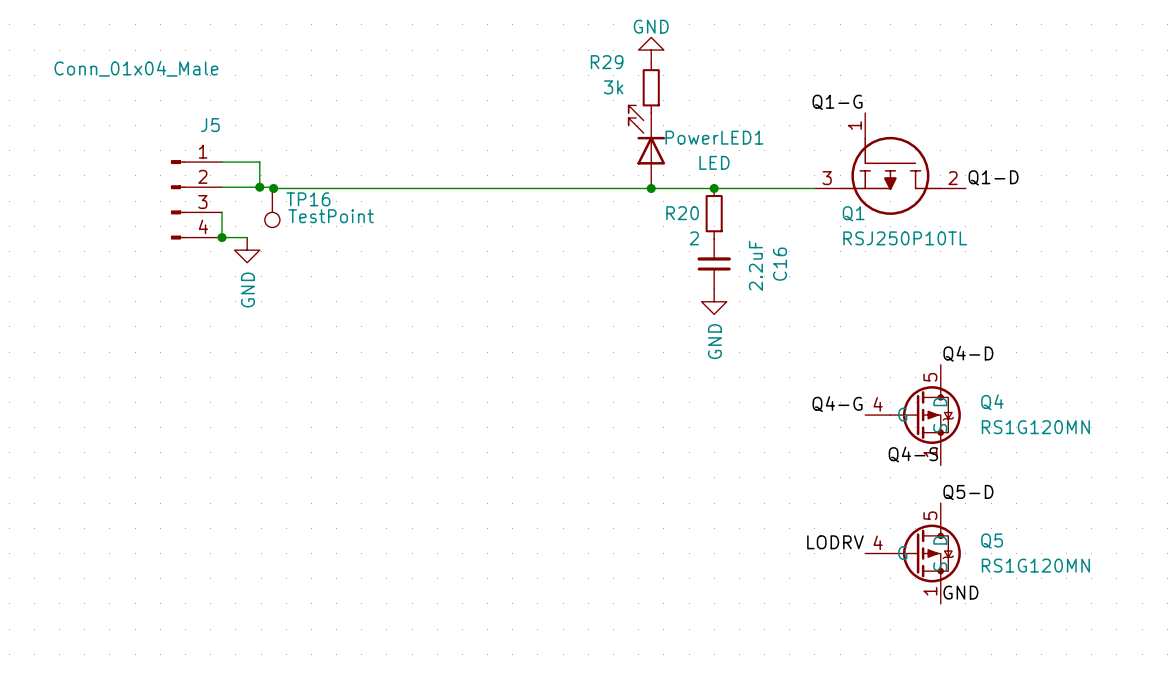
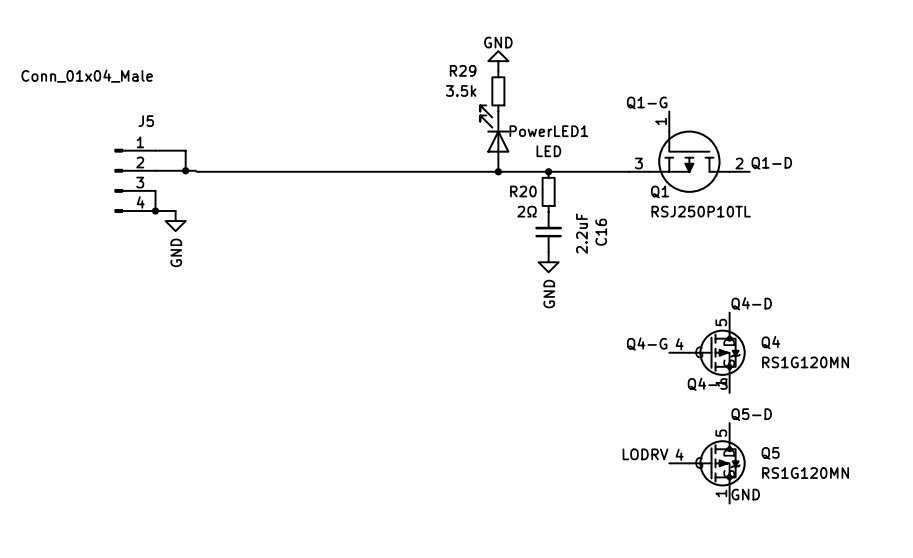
R29 value: 3k (613, 87) -> 3.5k (461, 90)
junction: (273, 188) -> none
TP16: TestPoint (272, 207) -> none
R20 value: 2 (694, 238) -> 2Ω (527, 211)

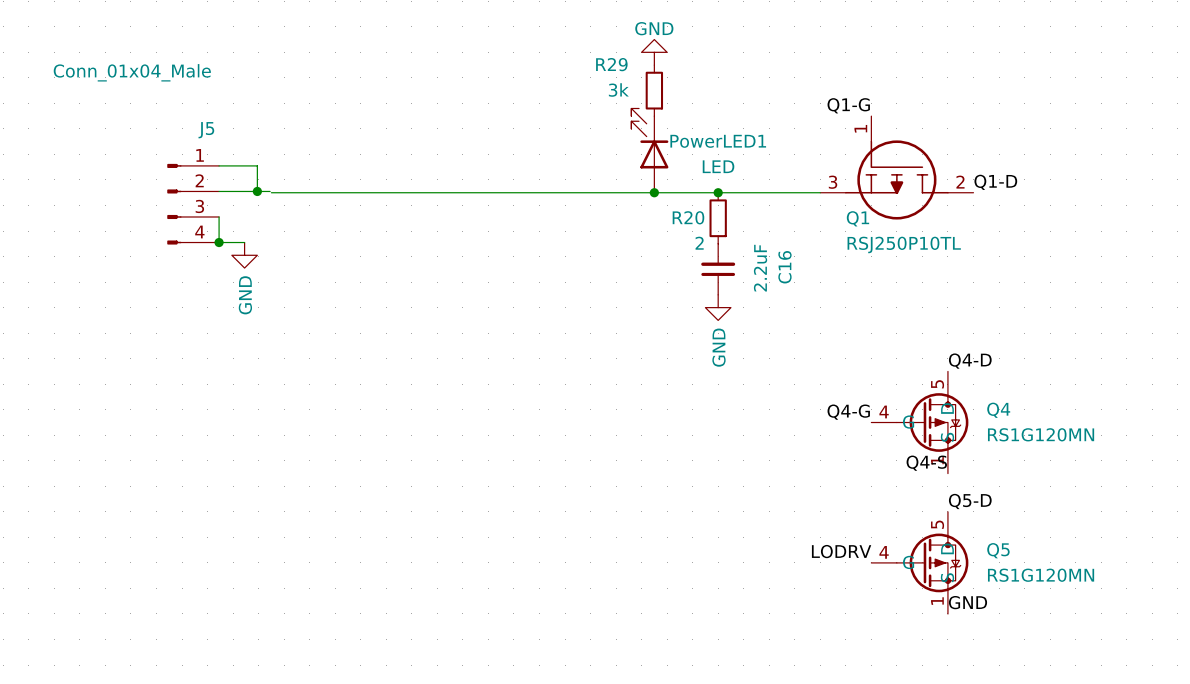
R29 value: 3.5k (461, 90) -> 3k (618, 89)
R20 value: 2Ω (527, 211) -> 2 (699, 243)

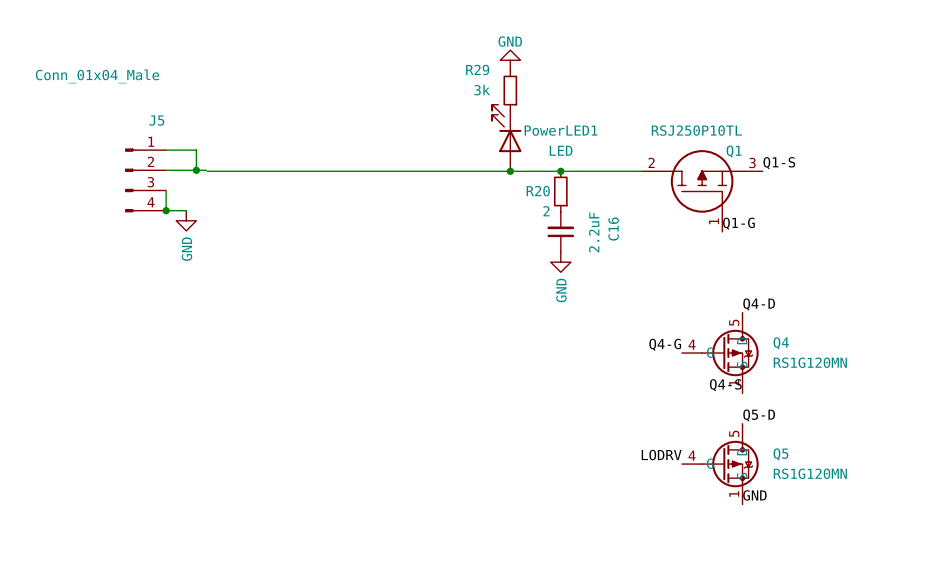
label position: Q1-G (848, 105) -> Q1-G (738, 223)
Q1 rotation: 0° (896, 179) -> 180° (702, 181)
label: Q1-D (995, 182) -> Q1-S (779, 163)

